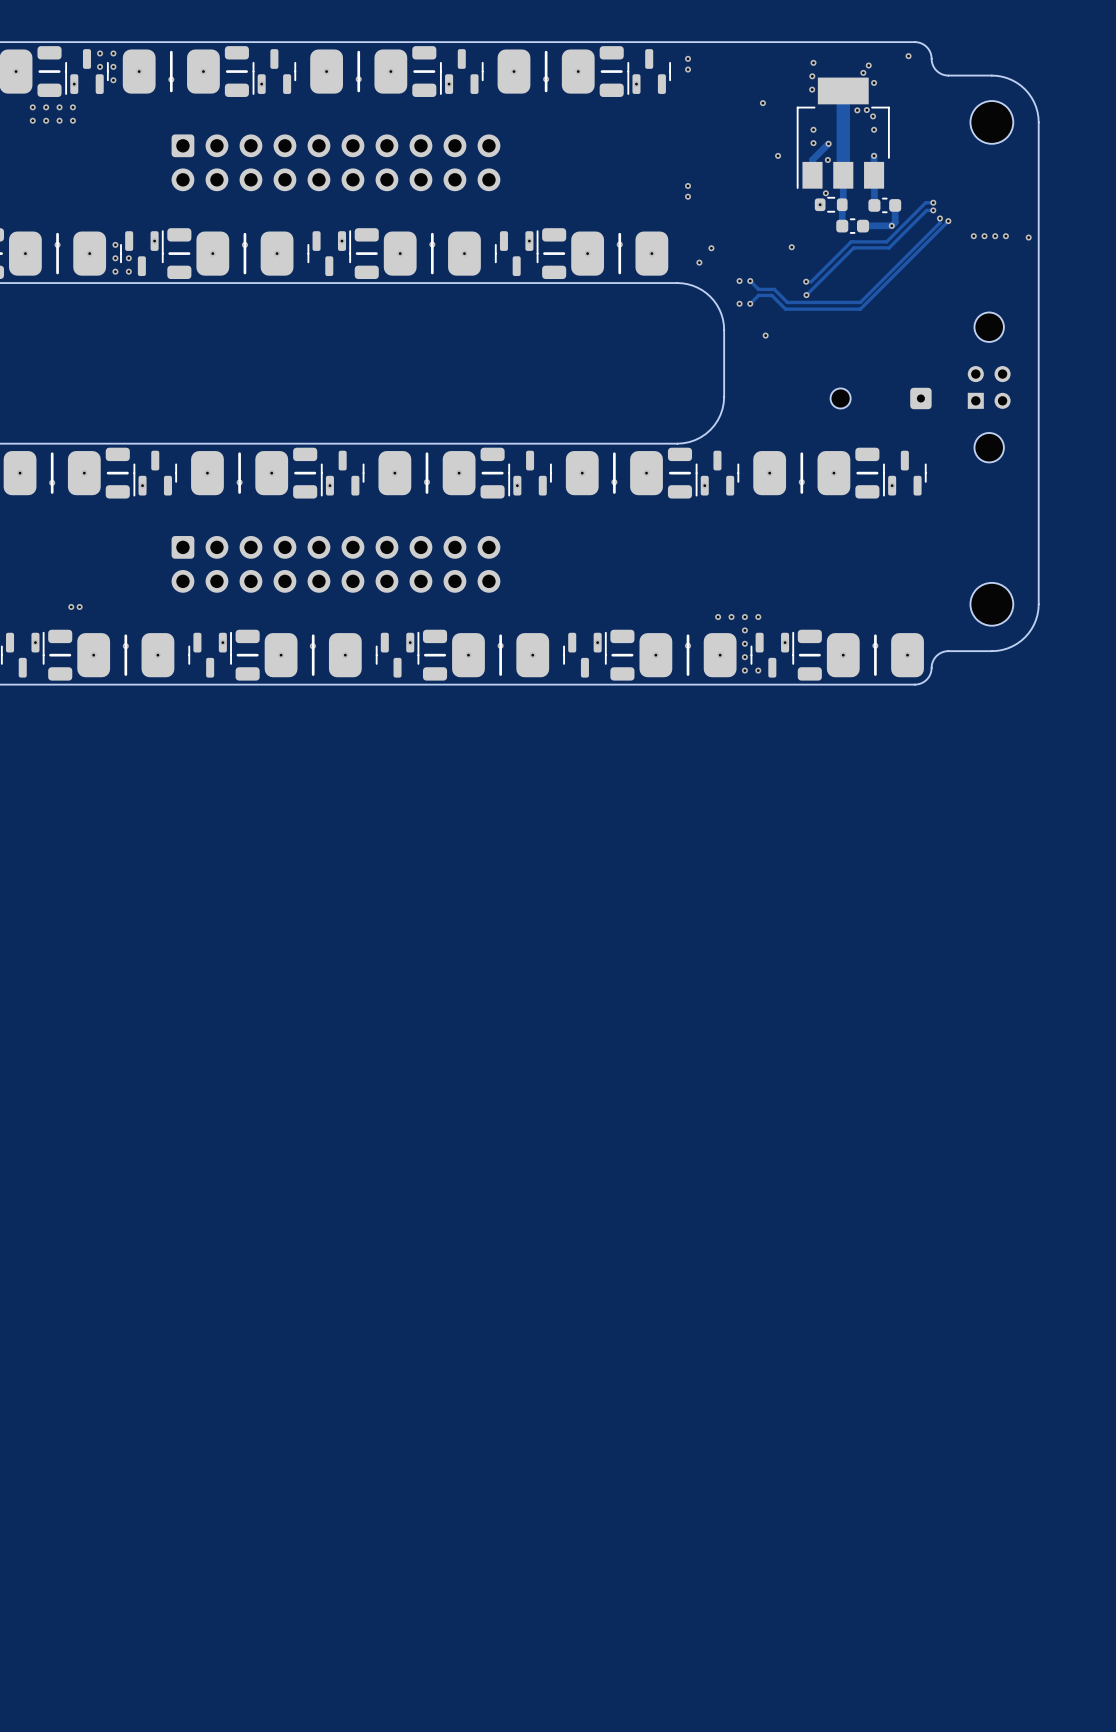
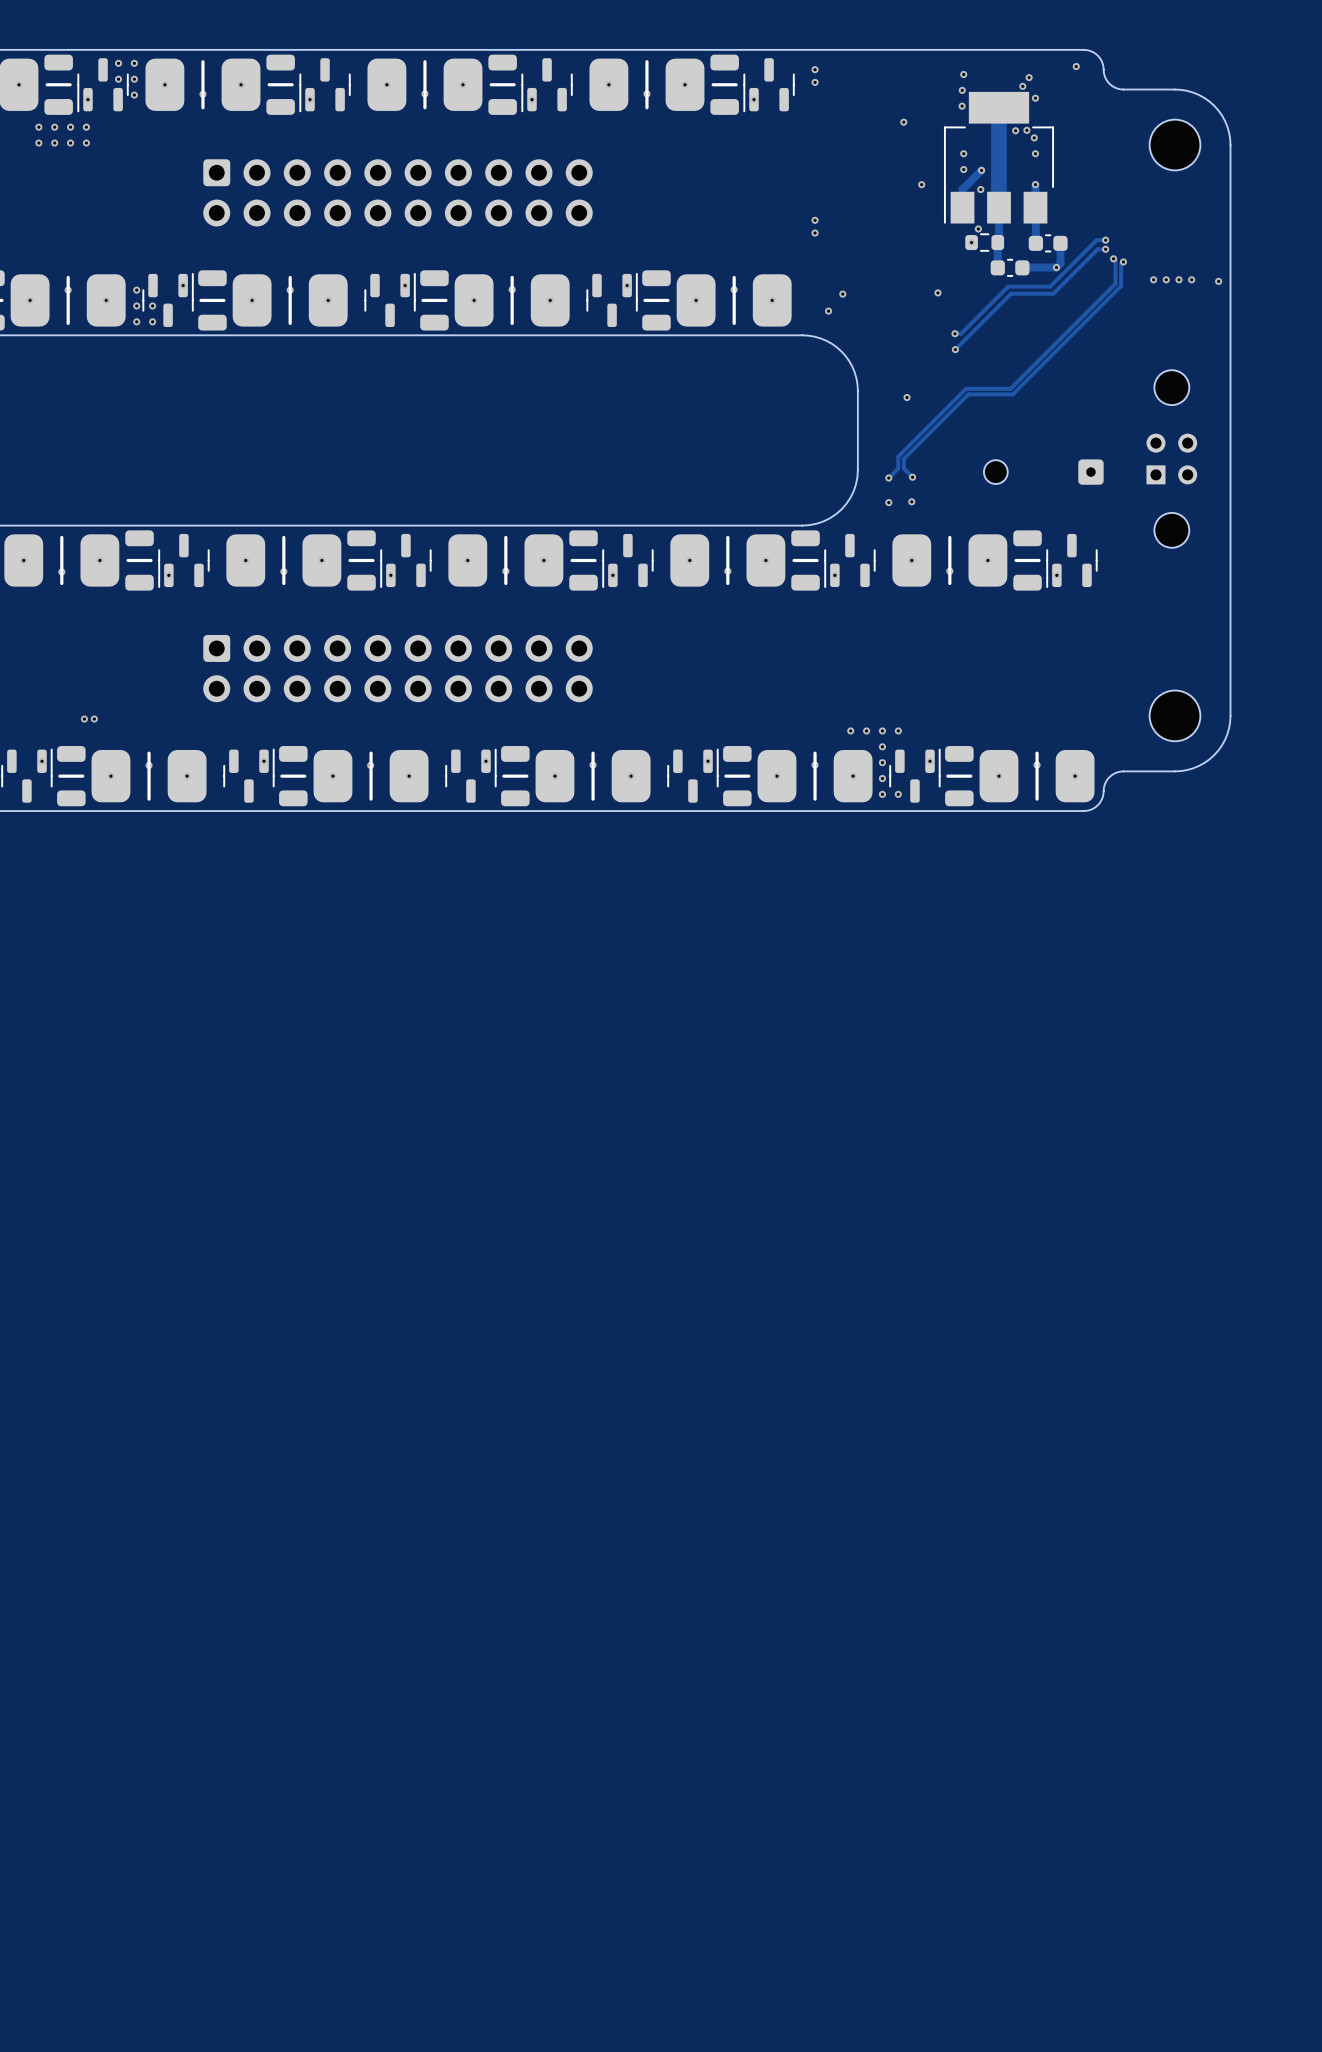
track: (940, 218) (940, 222) (860, 302) (787, 302) (774, 289) (758, 289) (750, 281) -> (1113, 258) (1115, 260) (1115, 283) (1010, 388) (966, 388) (898, 456) (898, 468) (888, 478)
track: (946, 223) (860, 309) (785, 309) (771, 295) (758, 295) (750, 303) -> (1121, 264) (1121, 286) (1012, 394) (968, 394) (903, 458) (903, 468) (912, 477)
via: (739, 281) -> none
via: (750, 281) -> none
via: (739, 303) -> none
via: (750, 303) -> none
via: none -> (912, 477)
via: none -> (888, 478)
via: none -> (911, 501)
via: none -> (888, 502)

